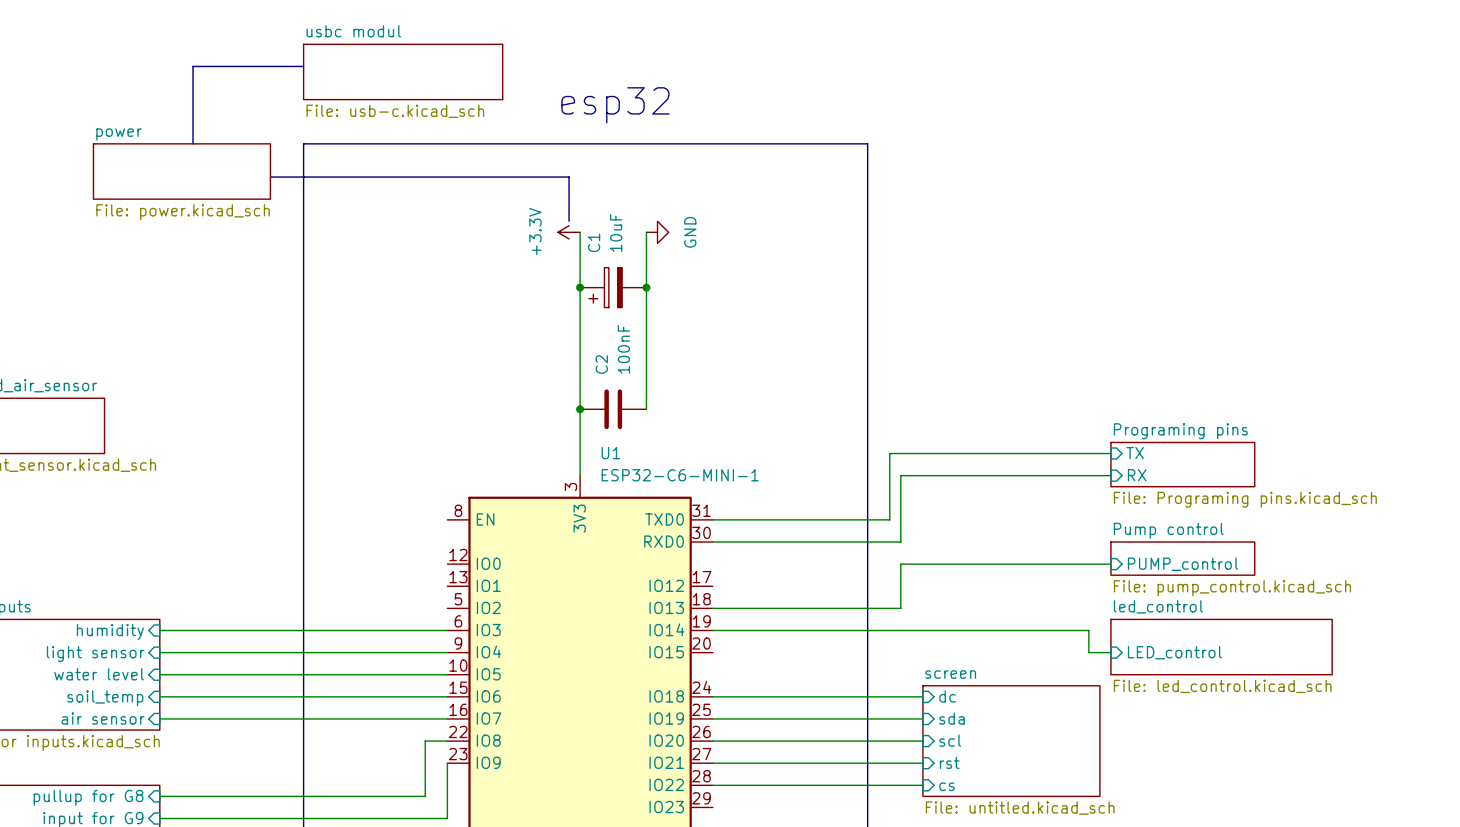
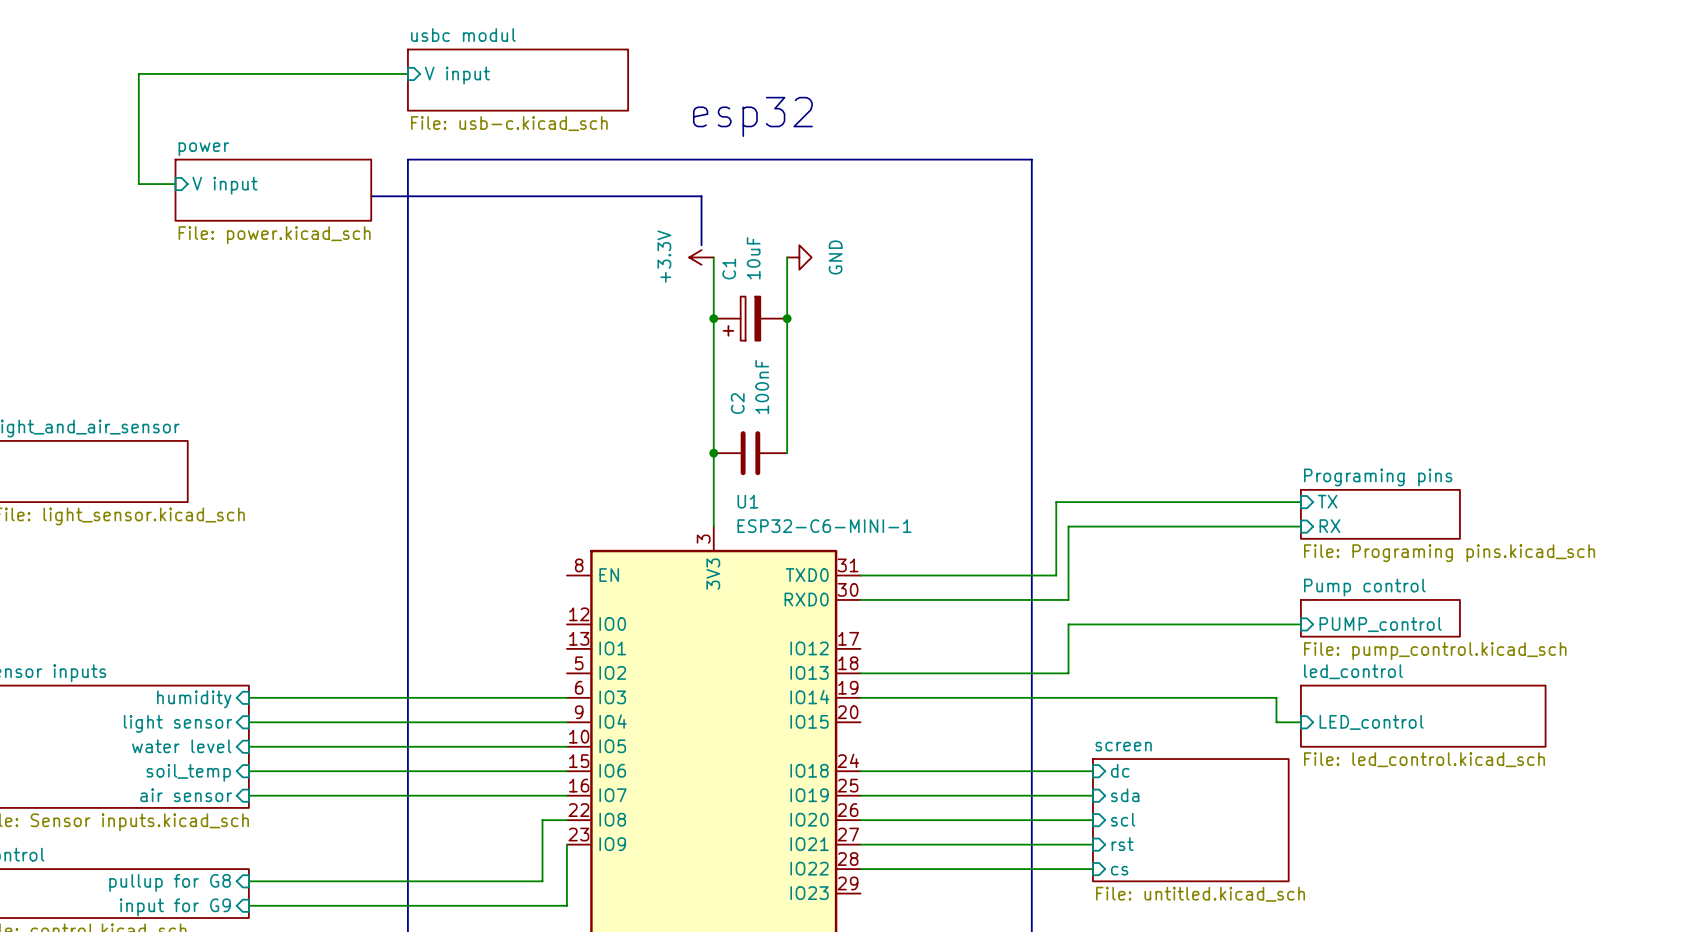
line: (303, 66) (193, 66) (193, 143) -> none
wire: none -> (407, 73) (138, 73) (138, 184) (175, 184)
sheet pin: none -> V input (457, 75)
sheet pin: none -> V input (224, 185)

